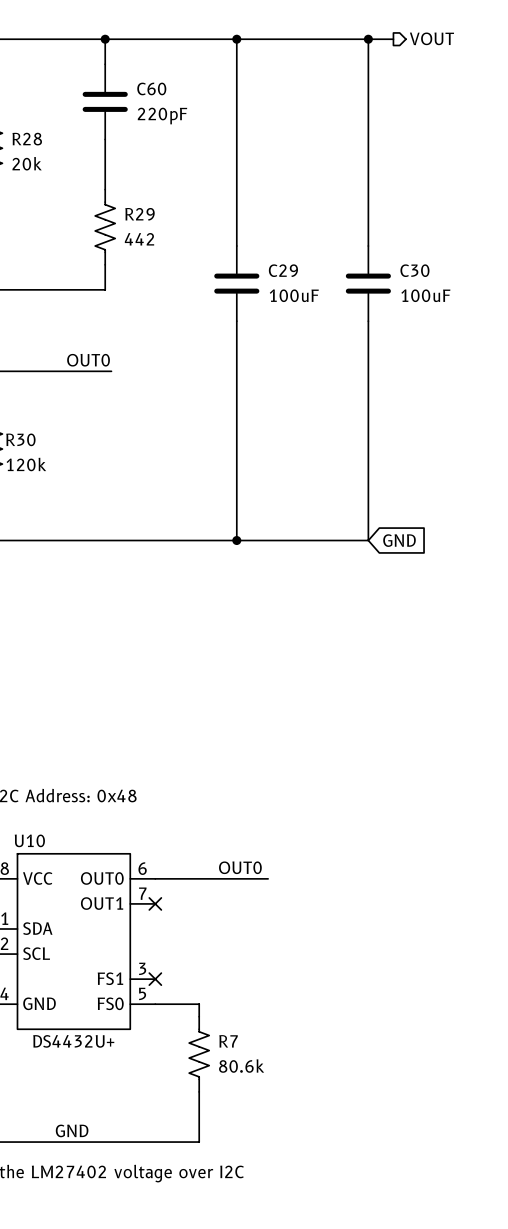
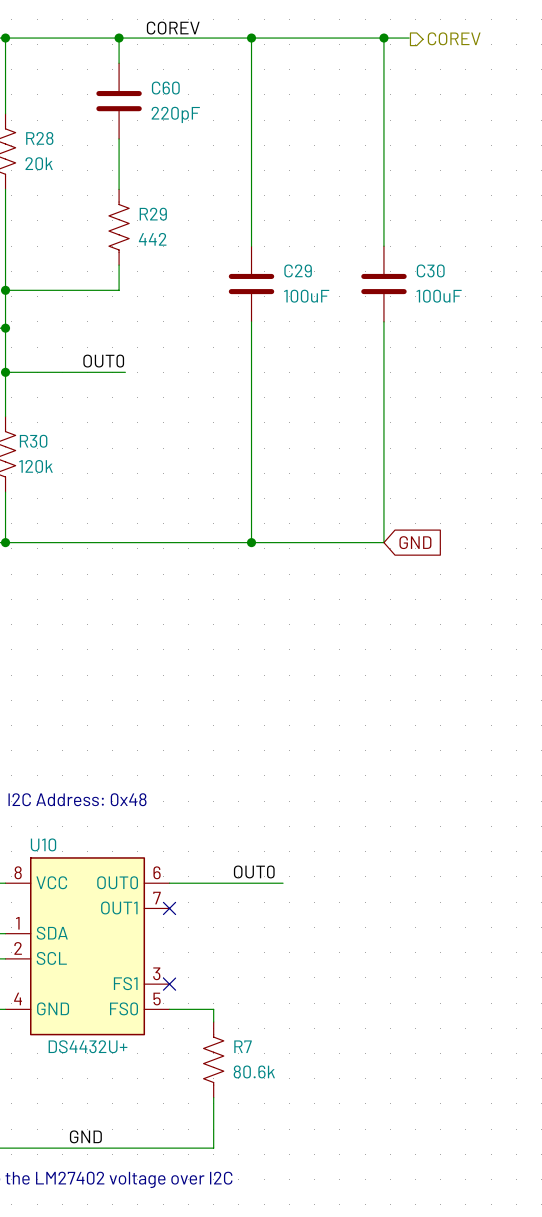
label: none -> COREV (173, 28)
hierarchical label: VOUT (431, 38) -> COREV (454, 38)

